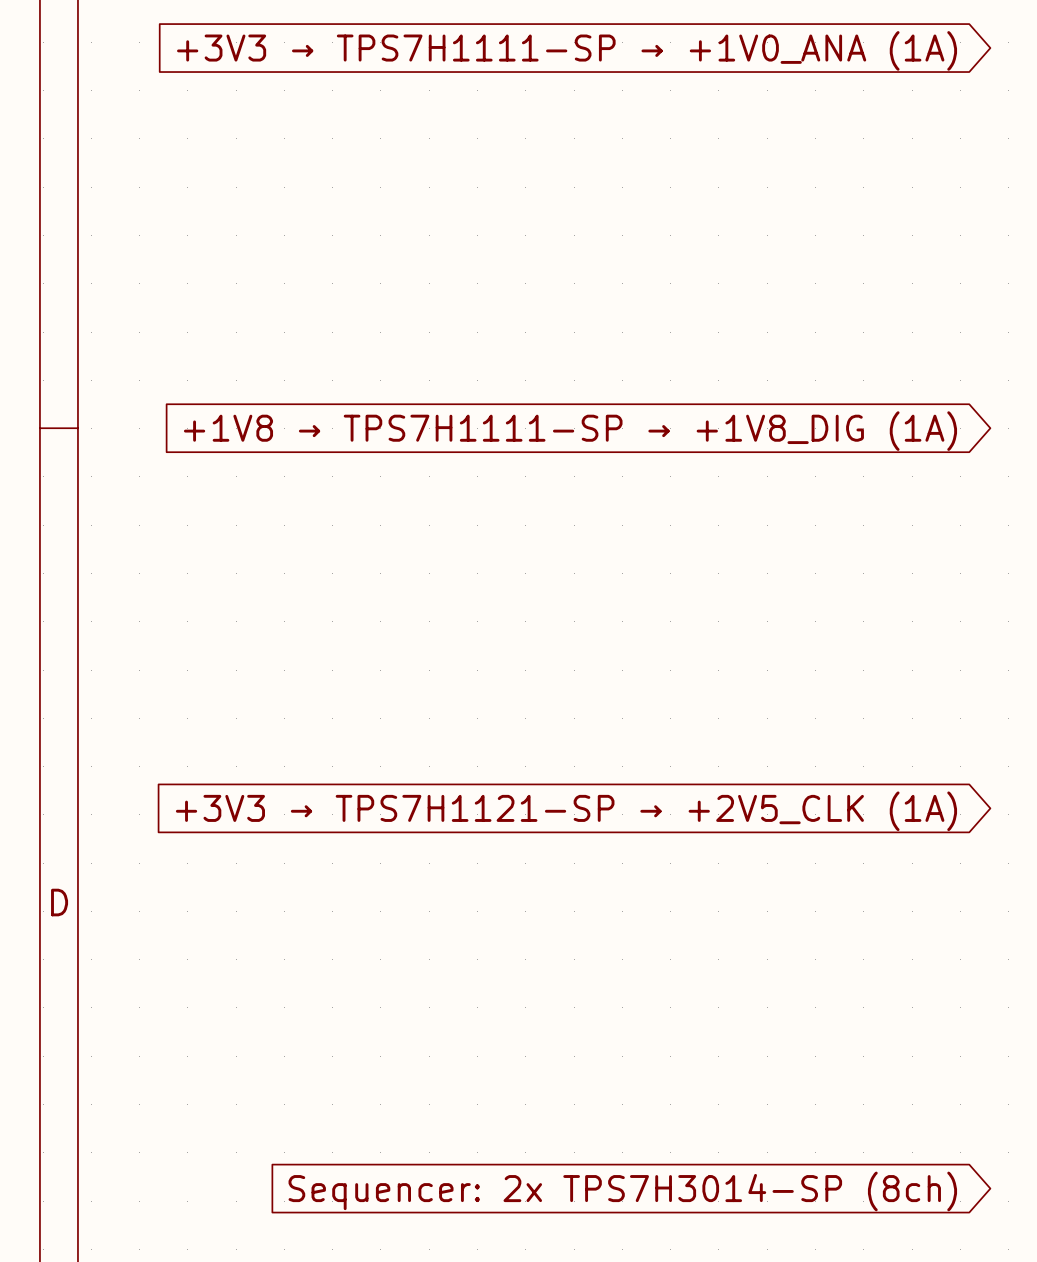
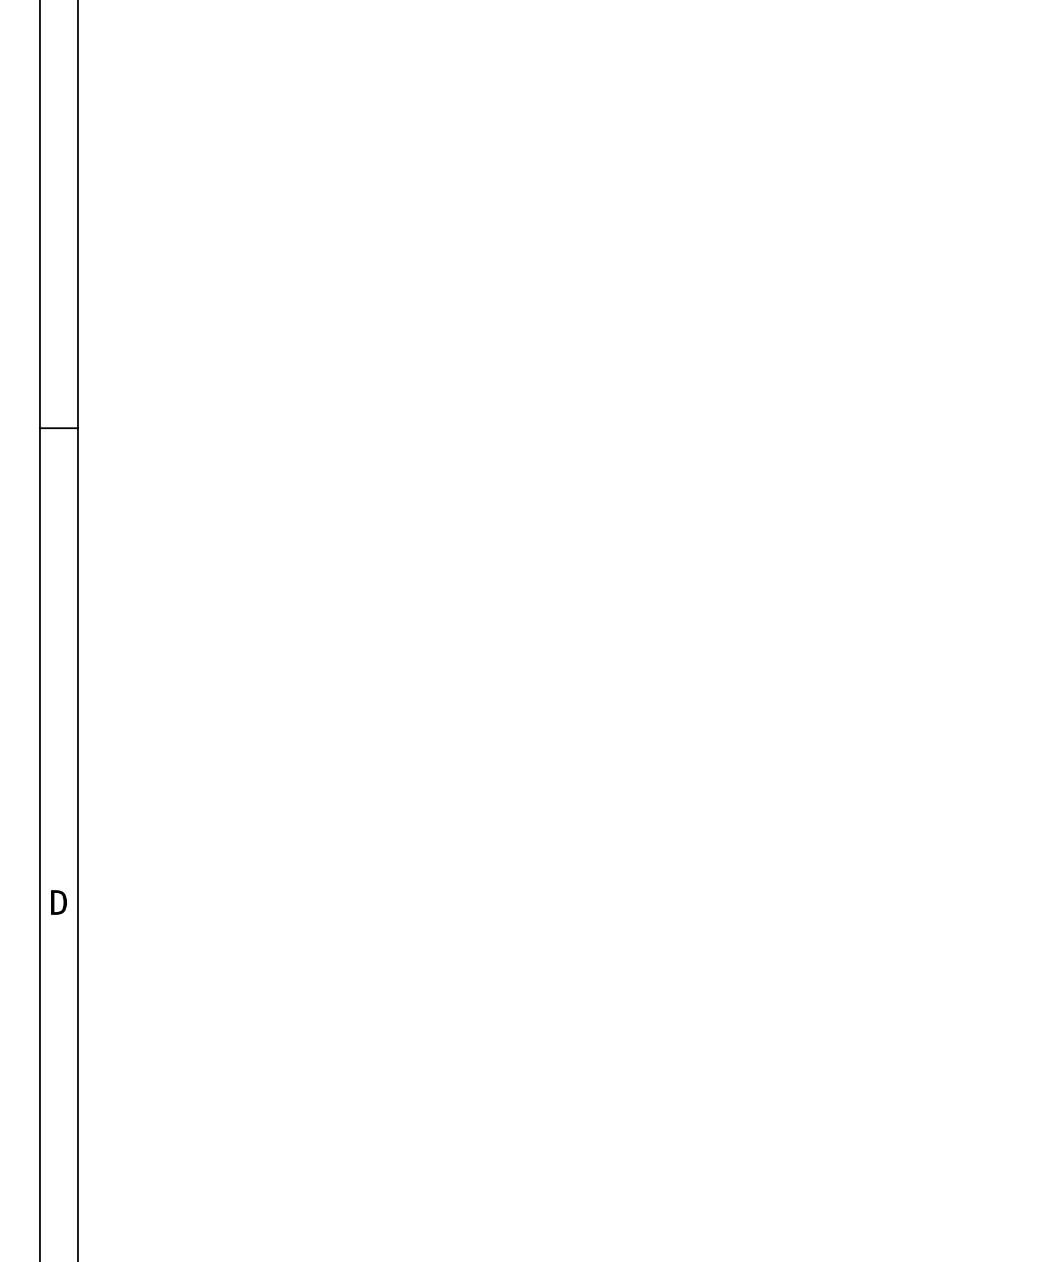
global label: +3V3 → TPS7H1111-SP → +1V0_ANA (1A) (567, 50) -> none
global label: +1V8 → TPS7H1111-SP → +1V8_DIG (1A) (570, 431) -> none
global label: +3V3 → TPS7H1121-SP → +2V5_CLK (1A) (566, 811) -> none
global label: Sequencer: 2x TPS7H3014-SP (8ch) (622, 1191) -> none

